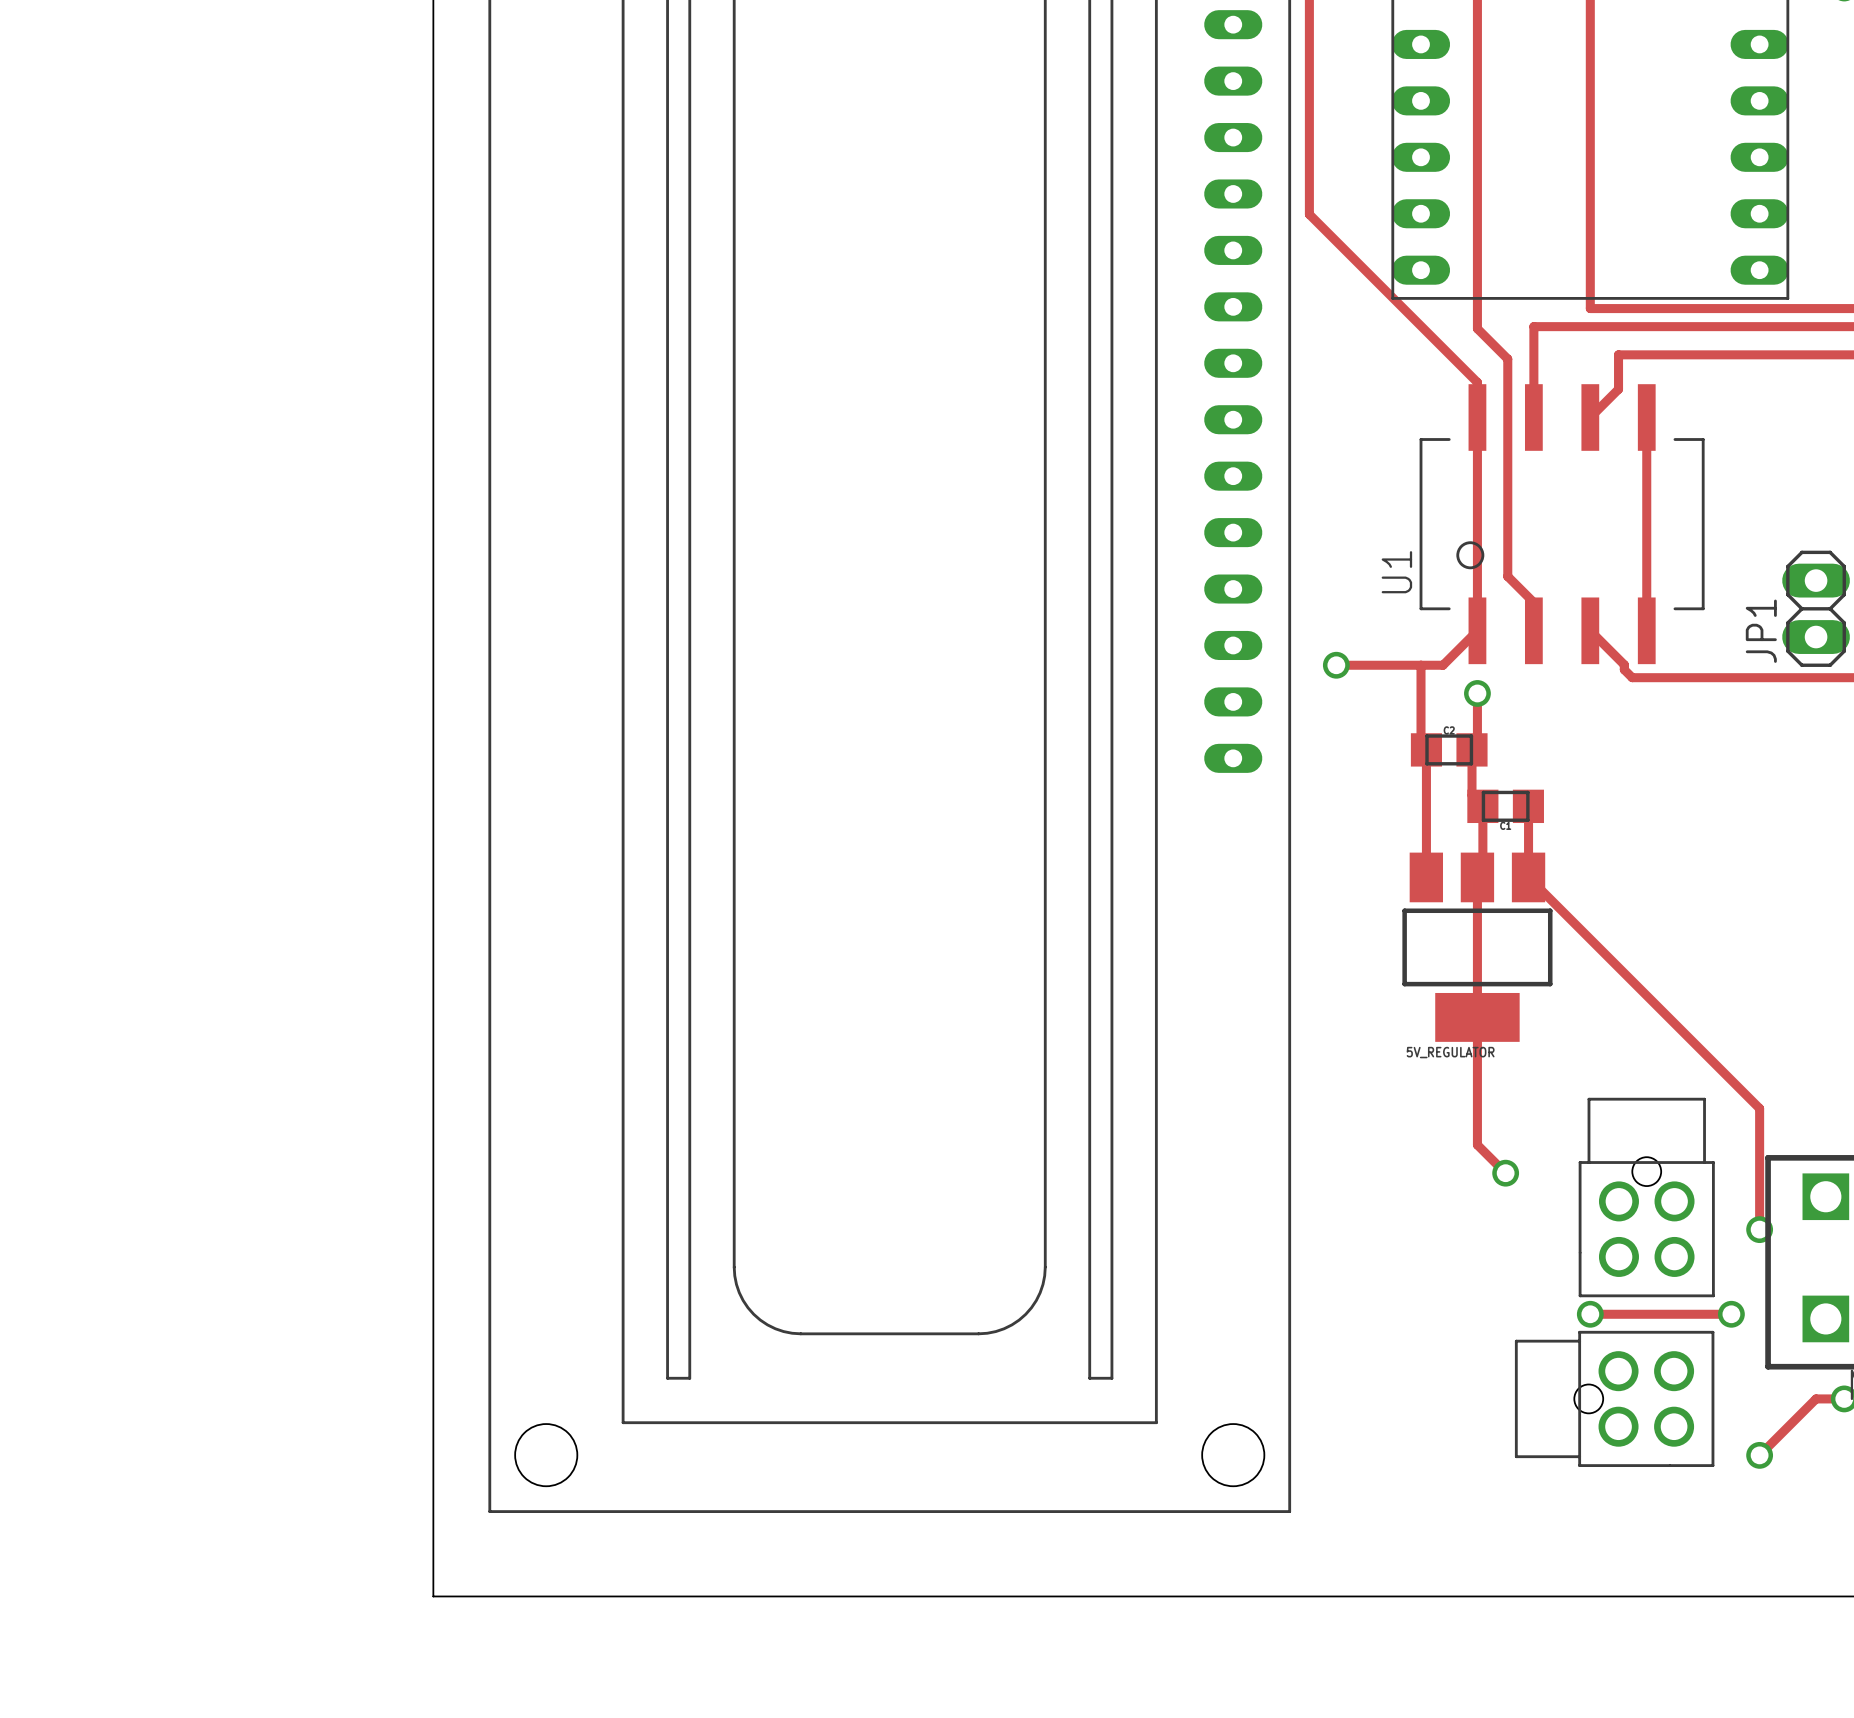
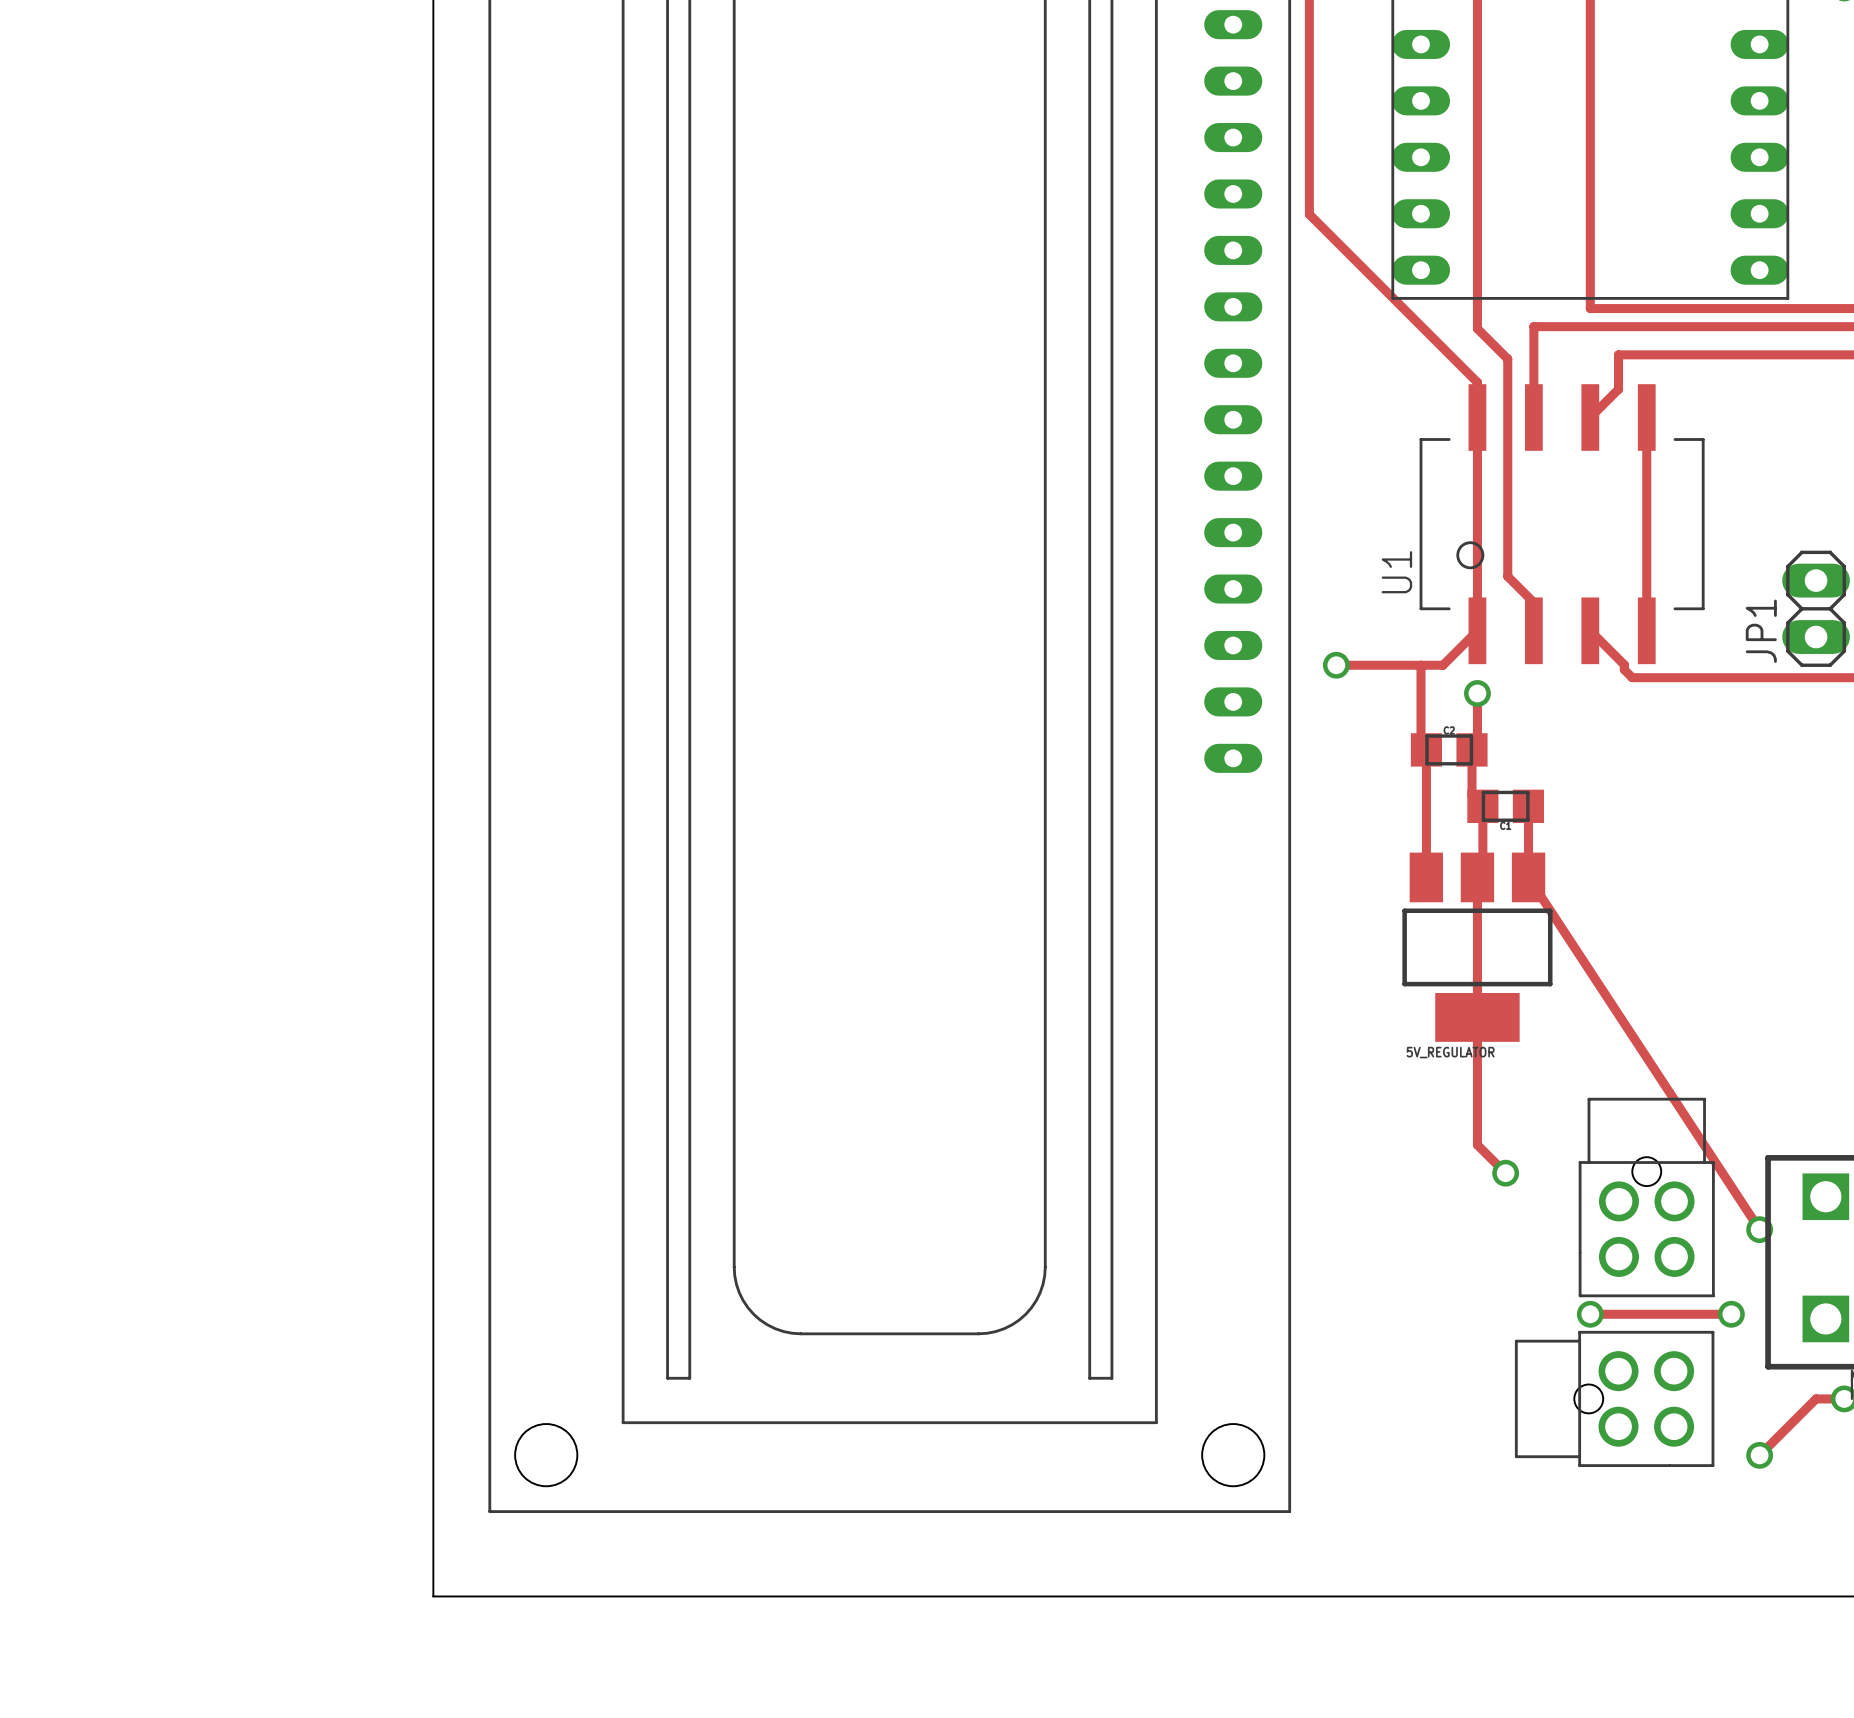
track: (1528, 806) (1528, 877) (1759, 1108) (1759, 1229) -> (1528, 806) (1528, 877) (1759, 1229)

